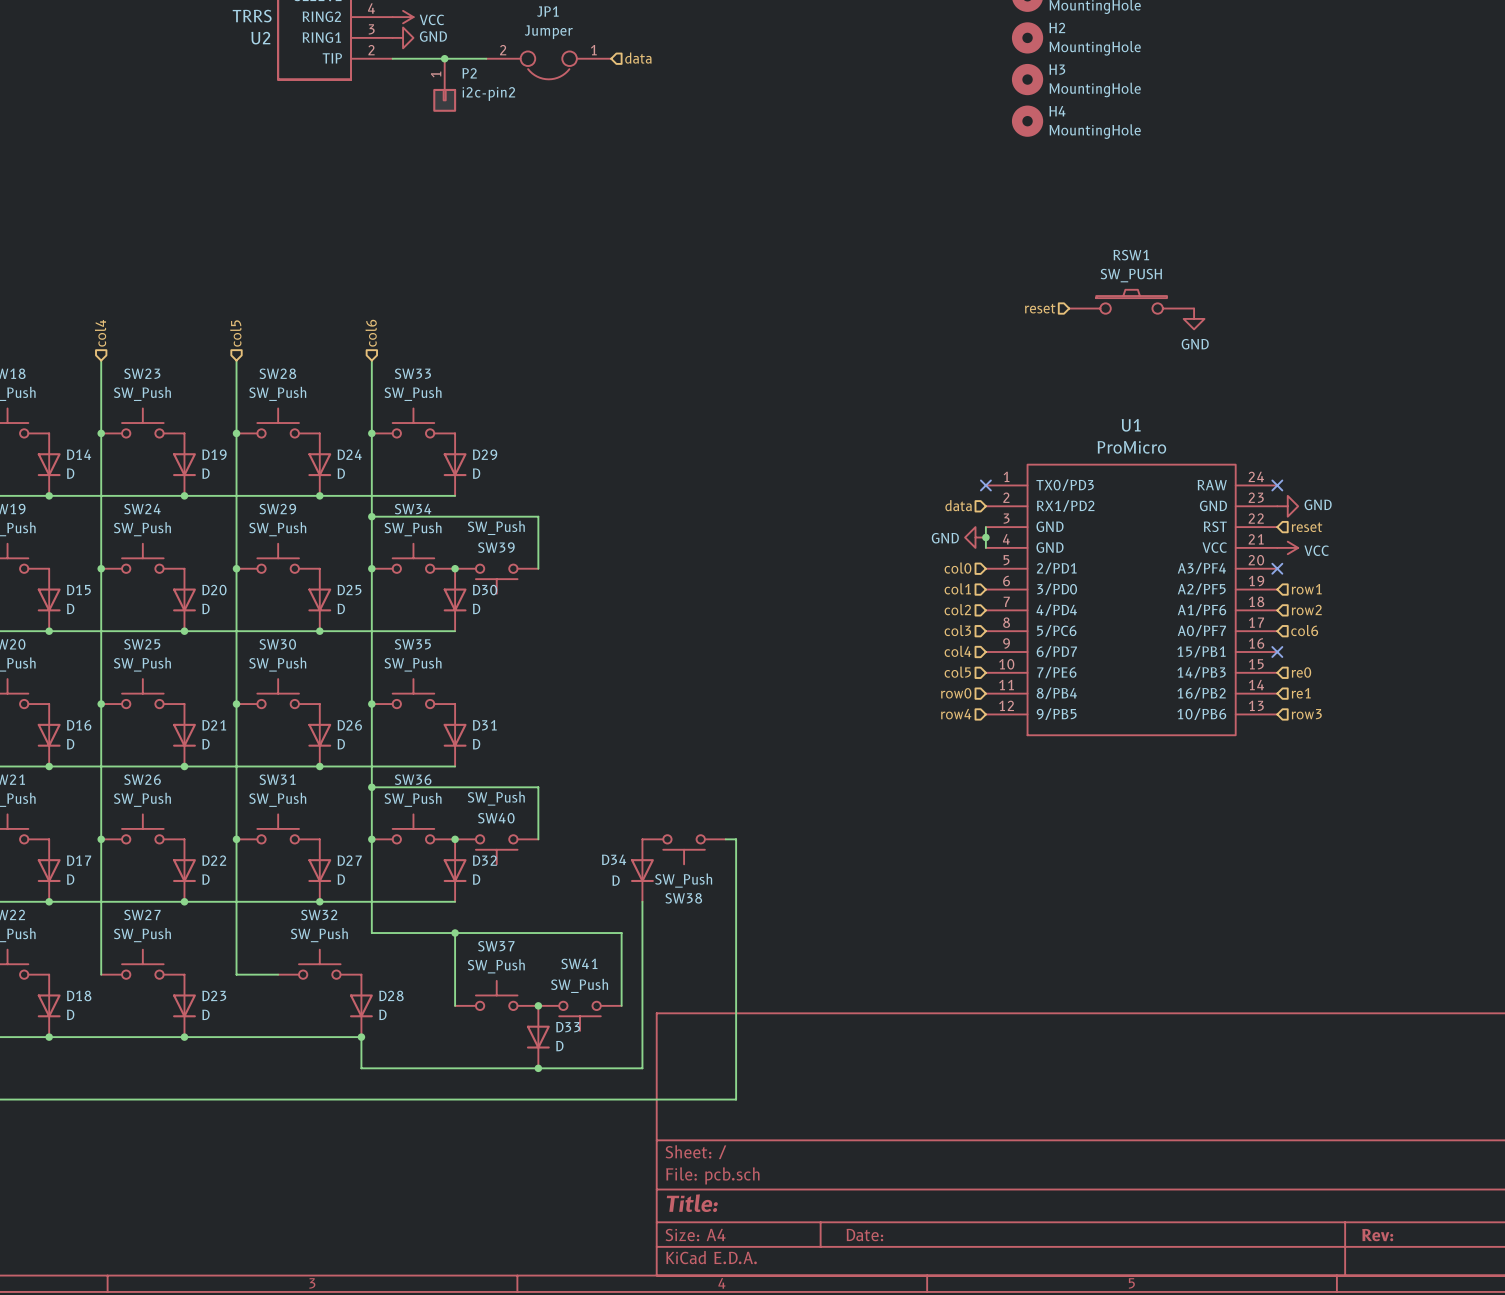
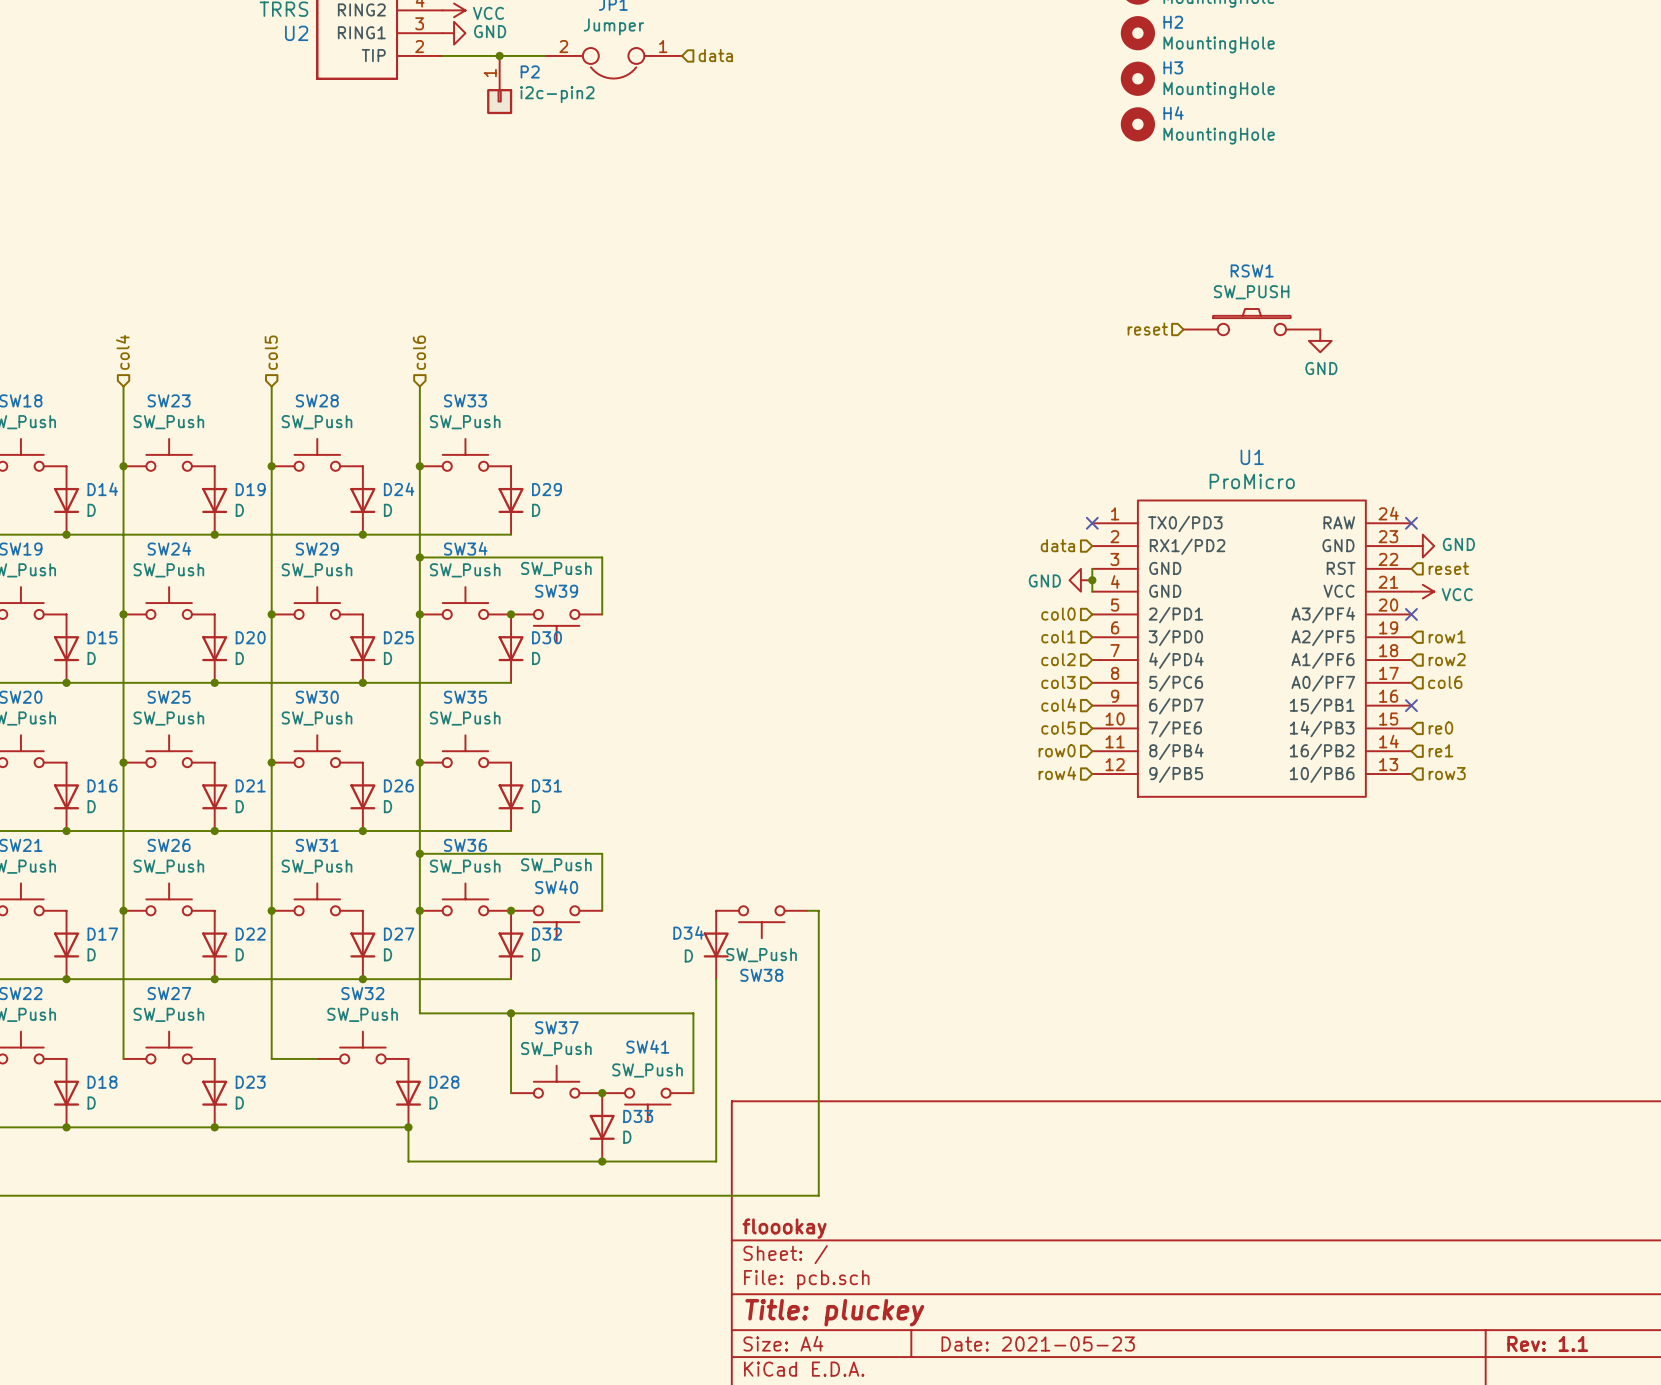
title block: none -> floookay (784, 1228)
title block: Title: (692, 1203) -> Title: pluckey (834, 1312)
title block: Date: (864, 1235) -> Date: 2021-05-23 (1038, 1343)
title block: Rev: (1377, 1235) -> Rev: 1.1 (1547, 1343)

